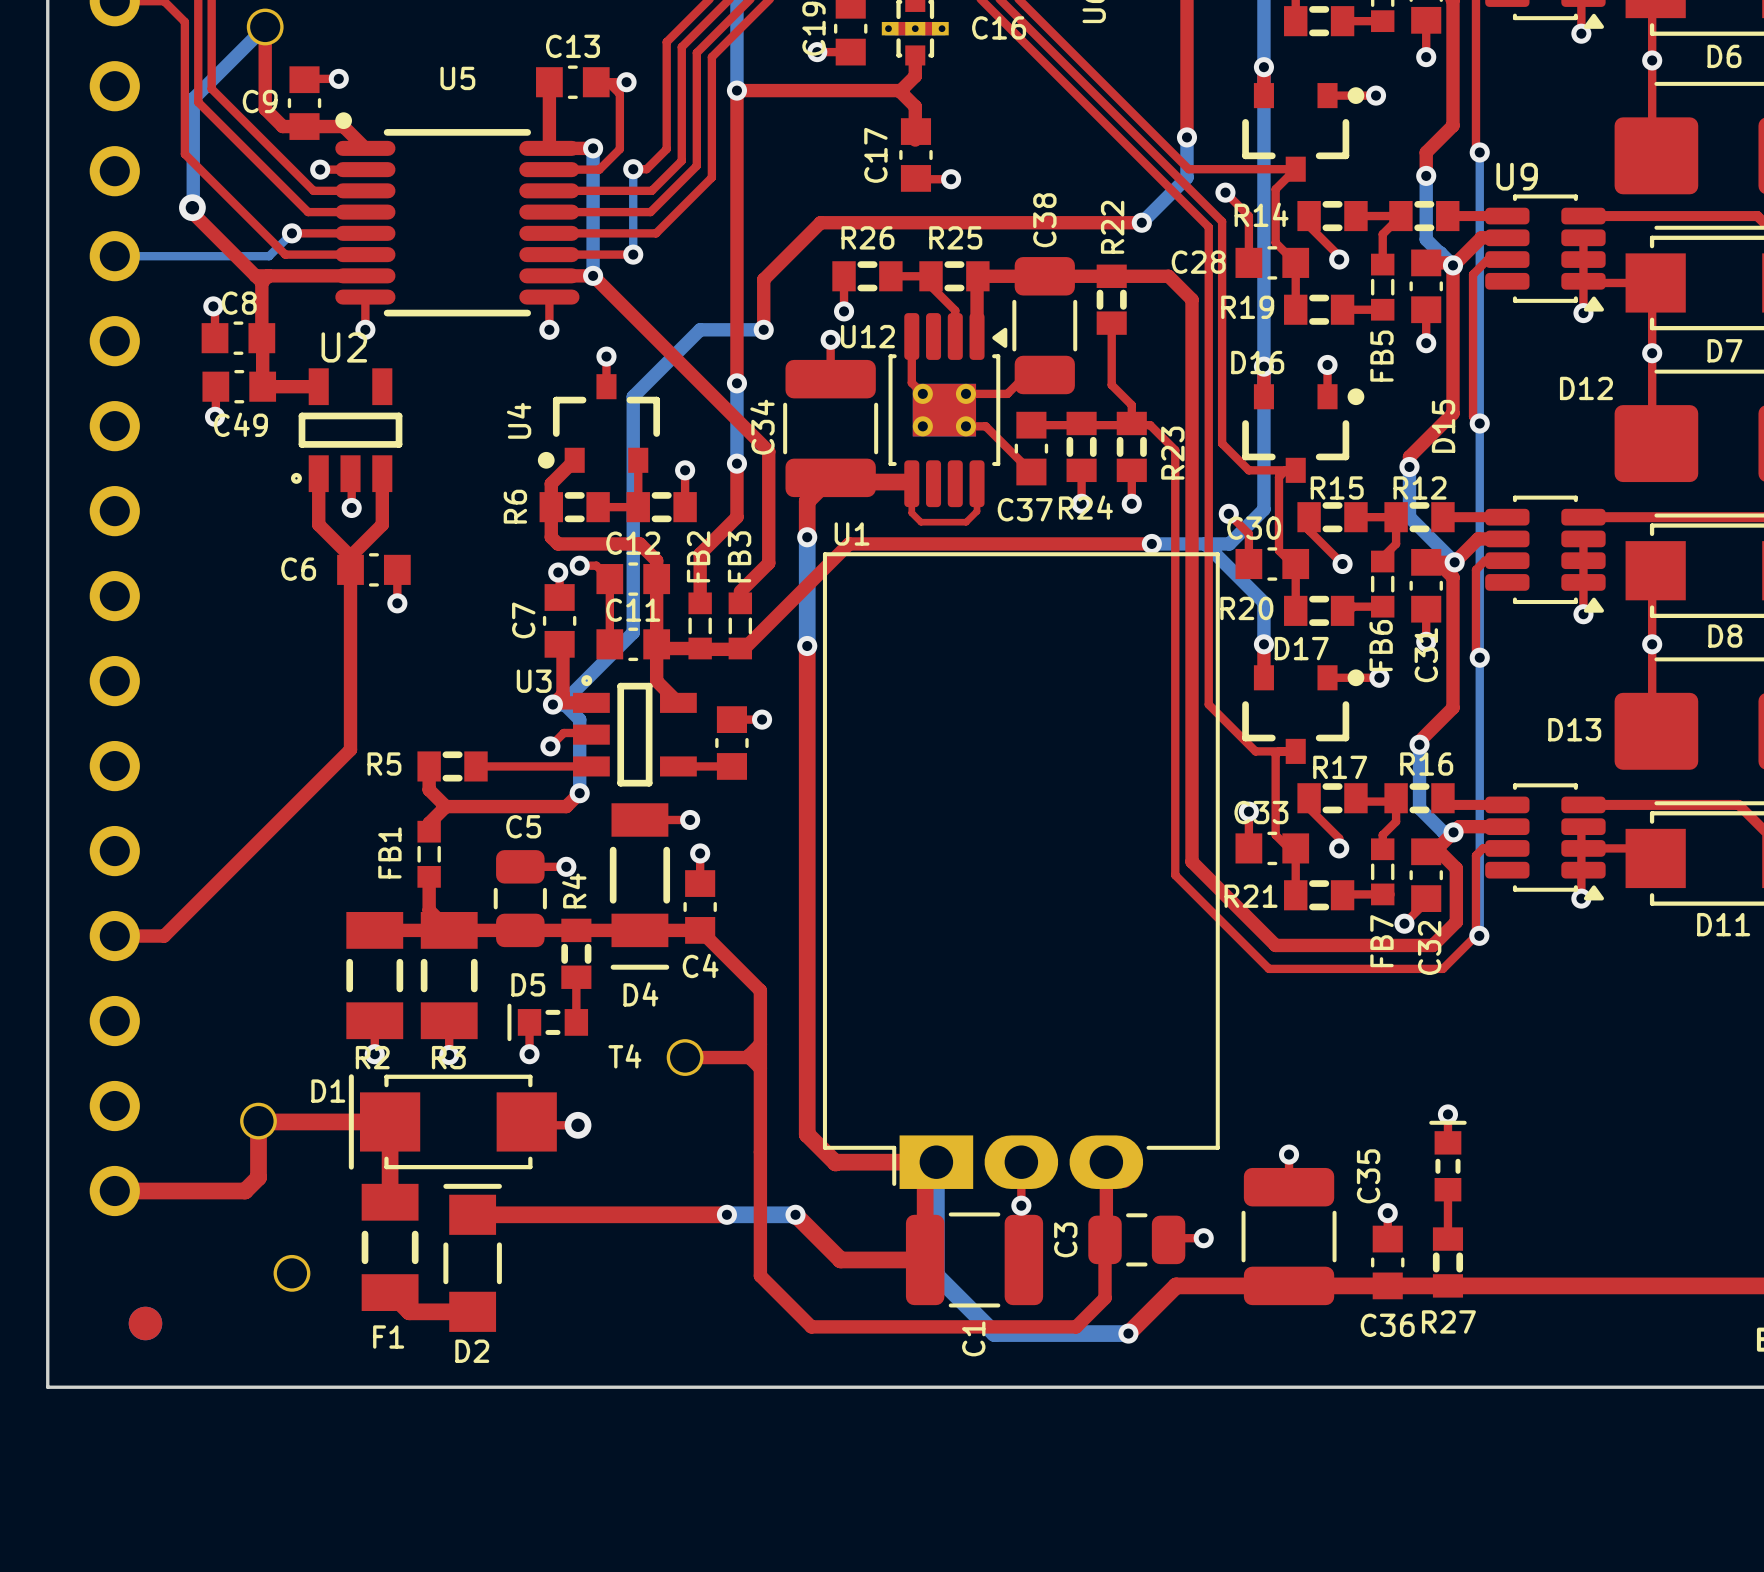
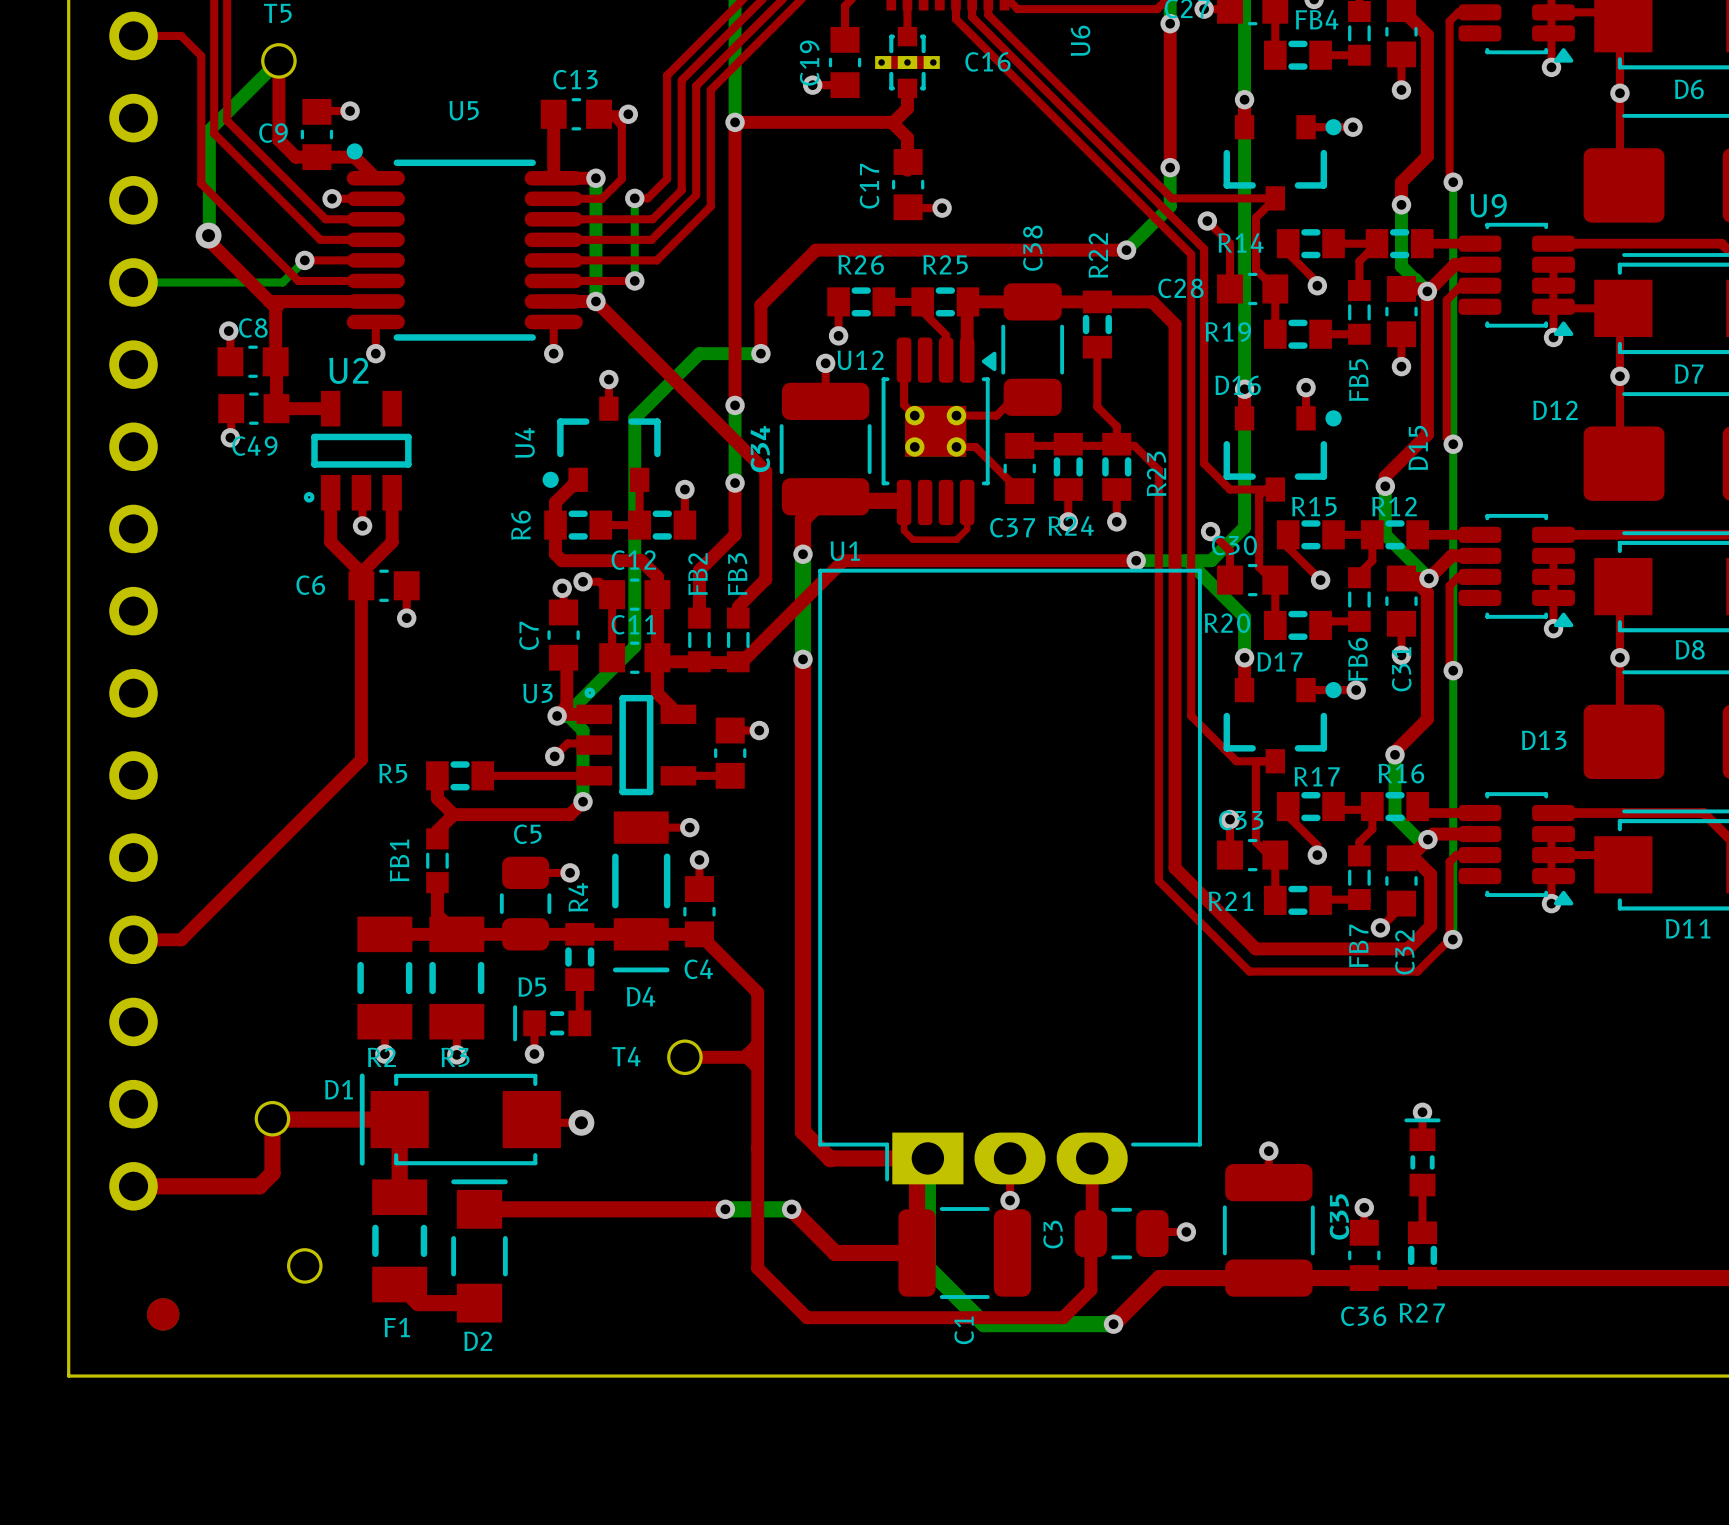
C35 name position: C35 (1368, 1176) -> C35 (1339, 1216)

